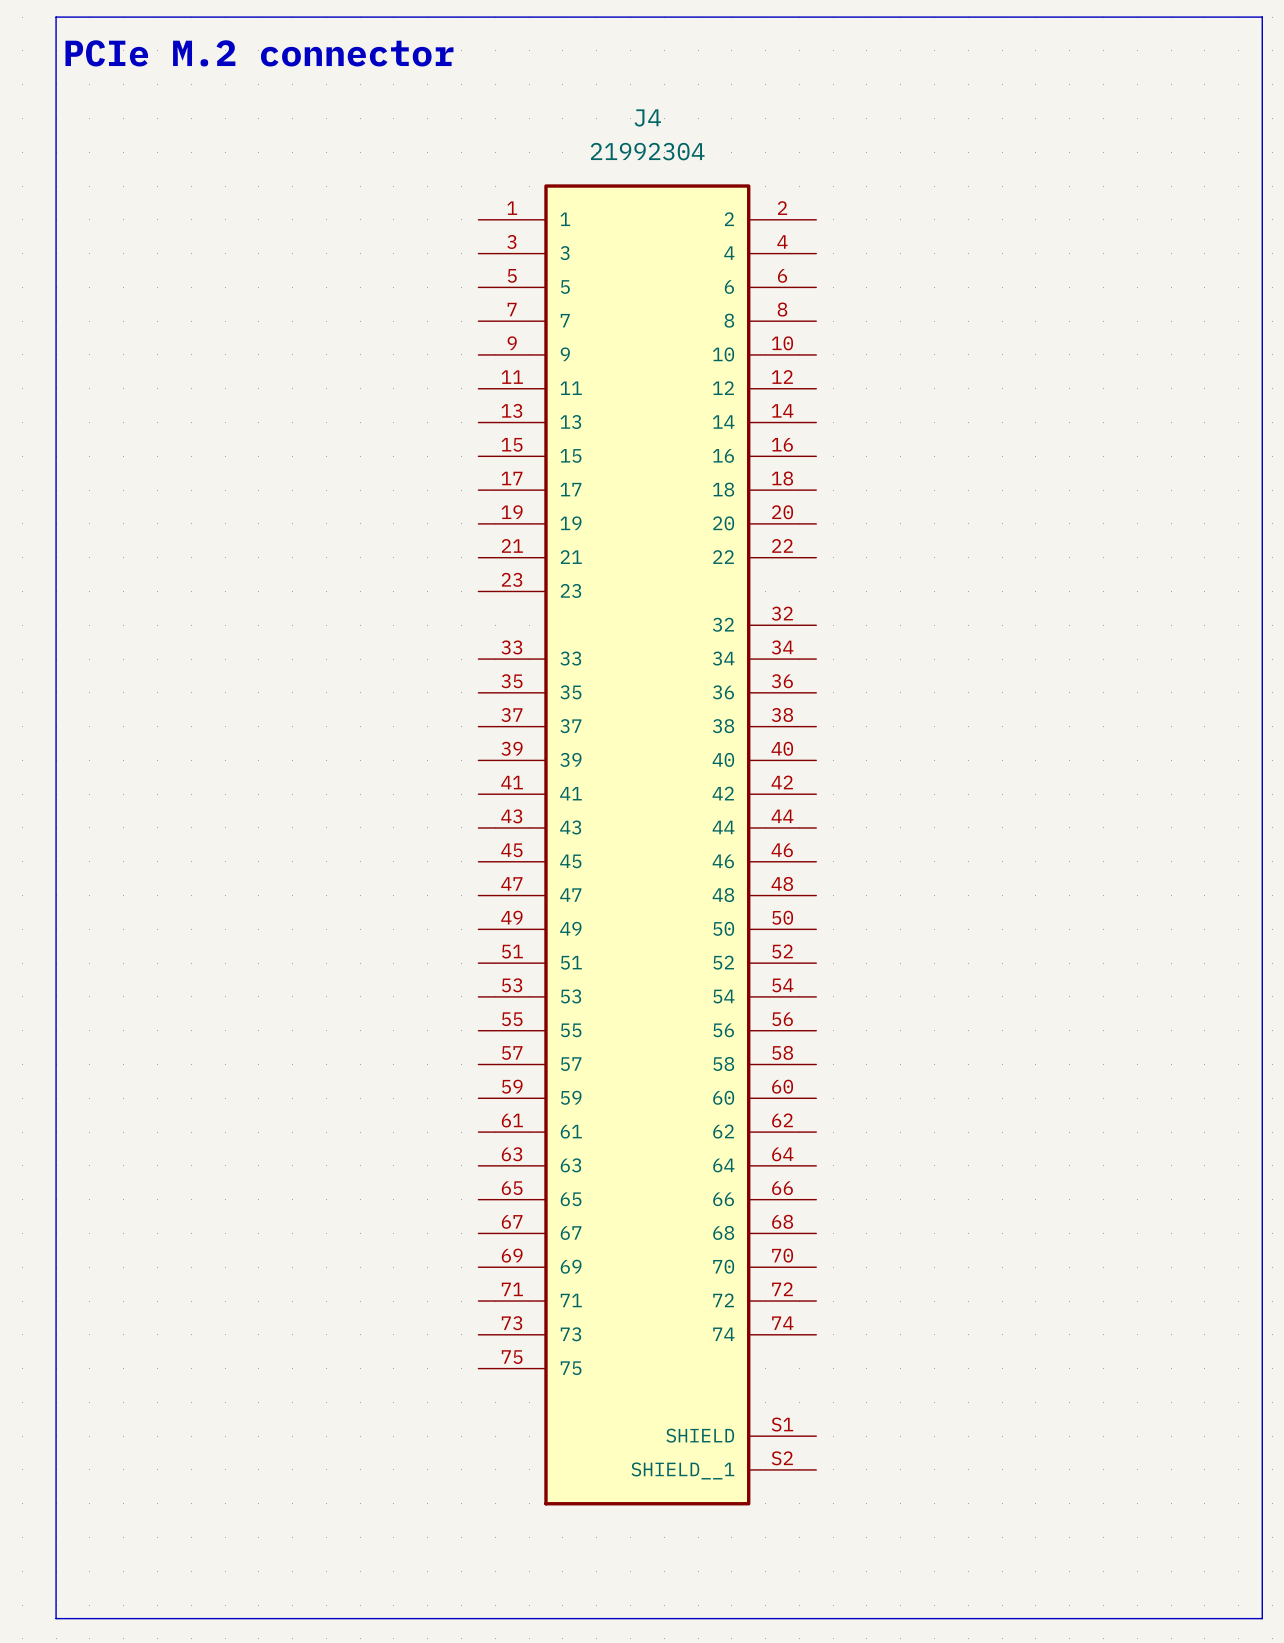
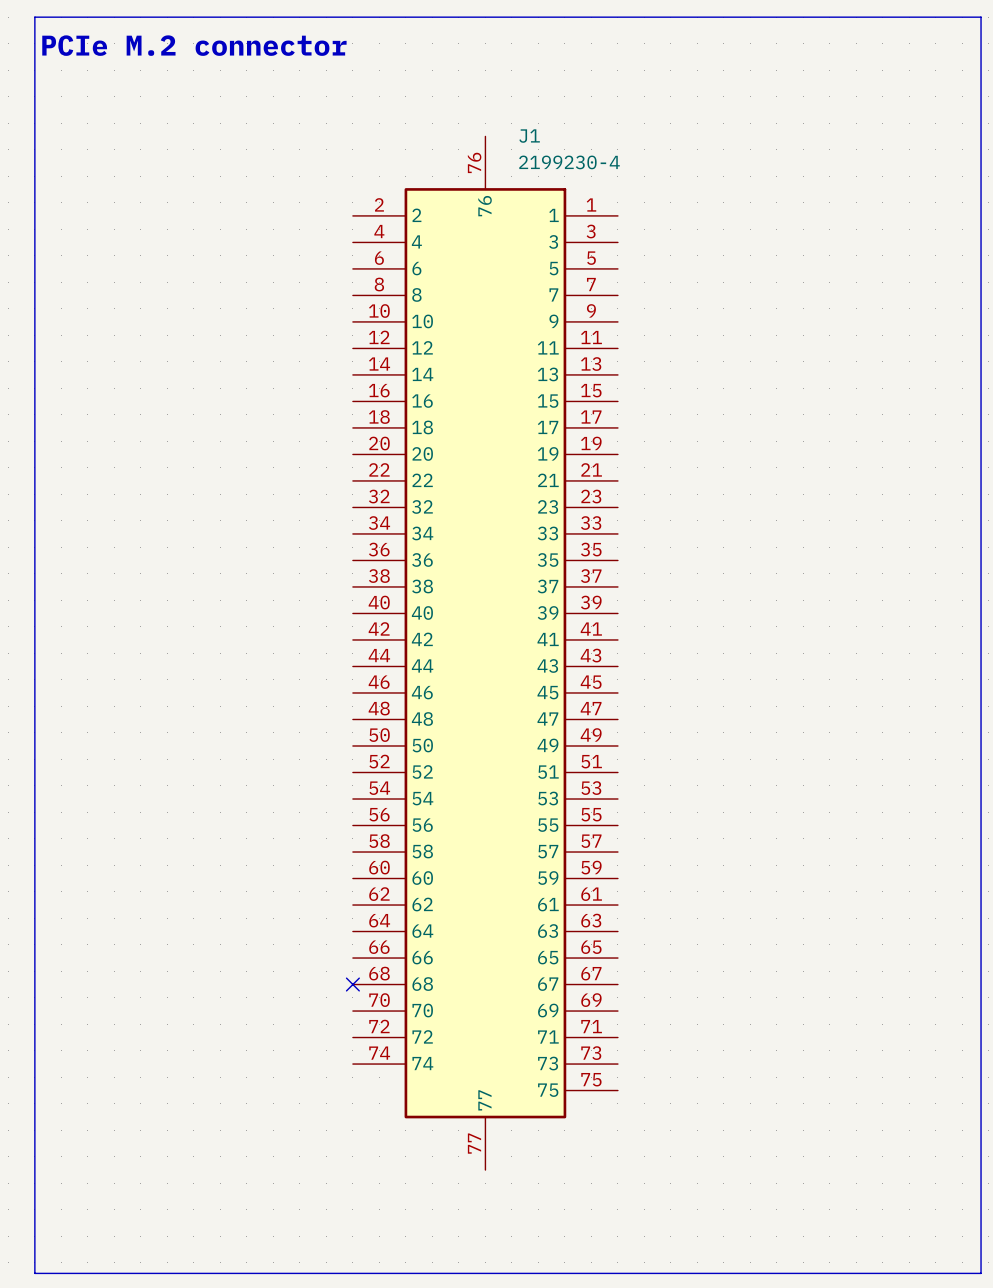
J1: none -> 2199230-4 (485, 653)
J4: 21992304 (647, 844) -> none
no-connect mark: none -> (352, 984)

